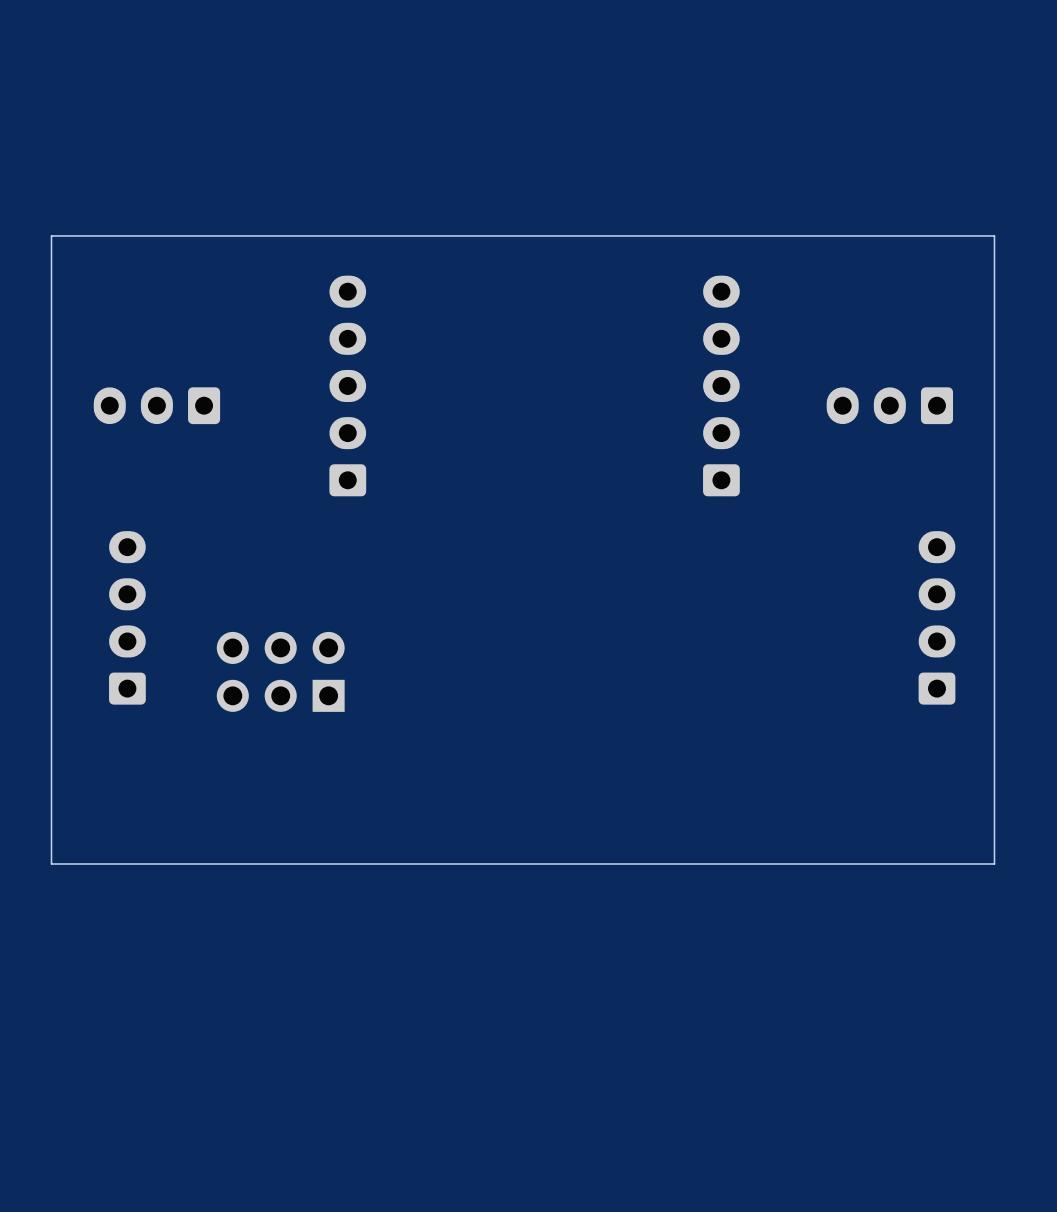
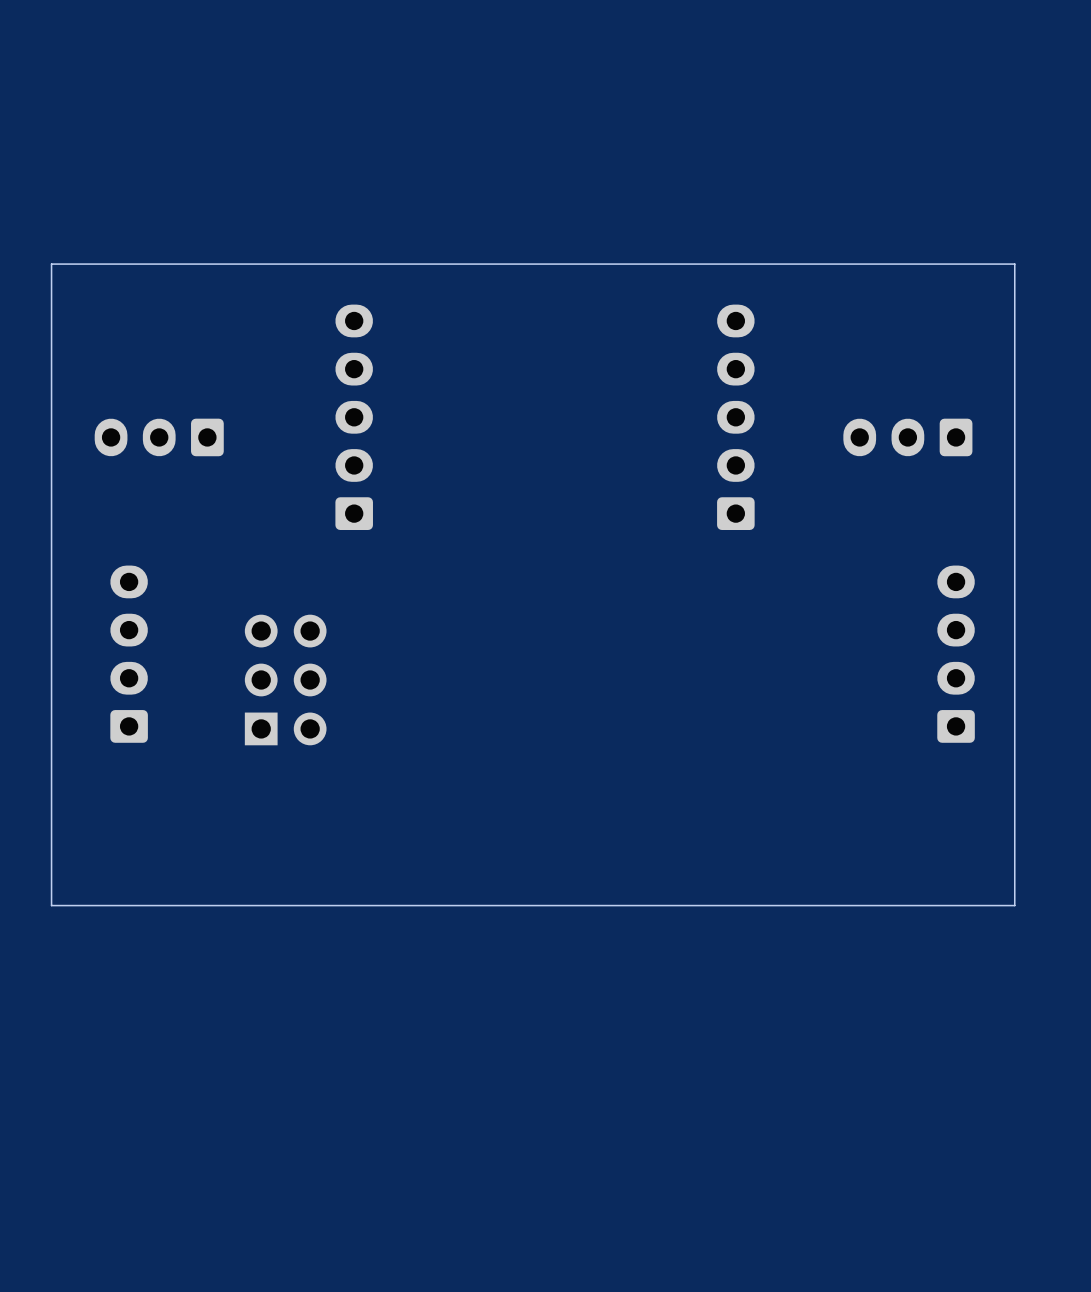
part rotation: 0° (280, 671) -> 90° clockwise (285, 679)

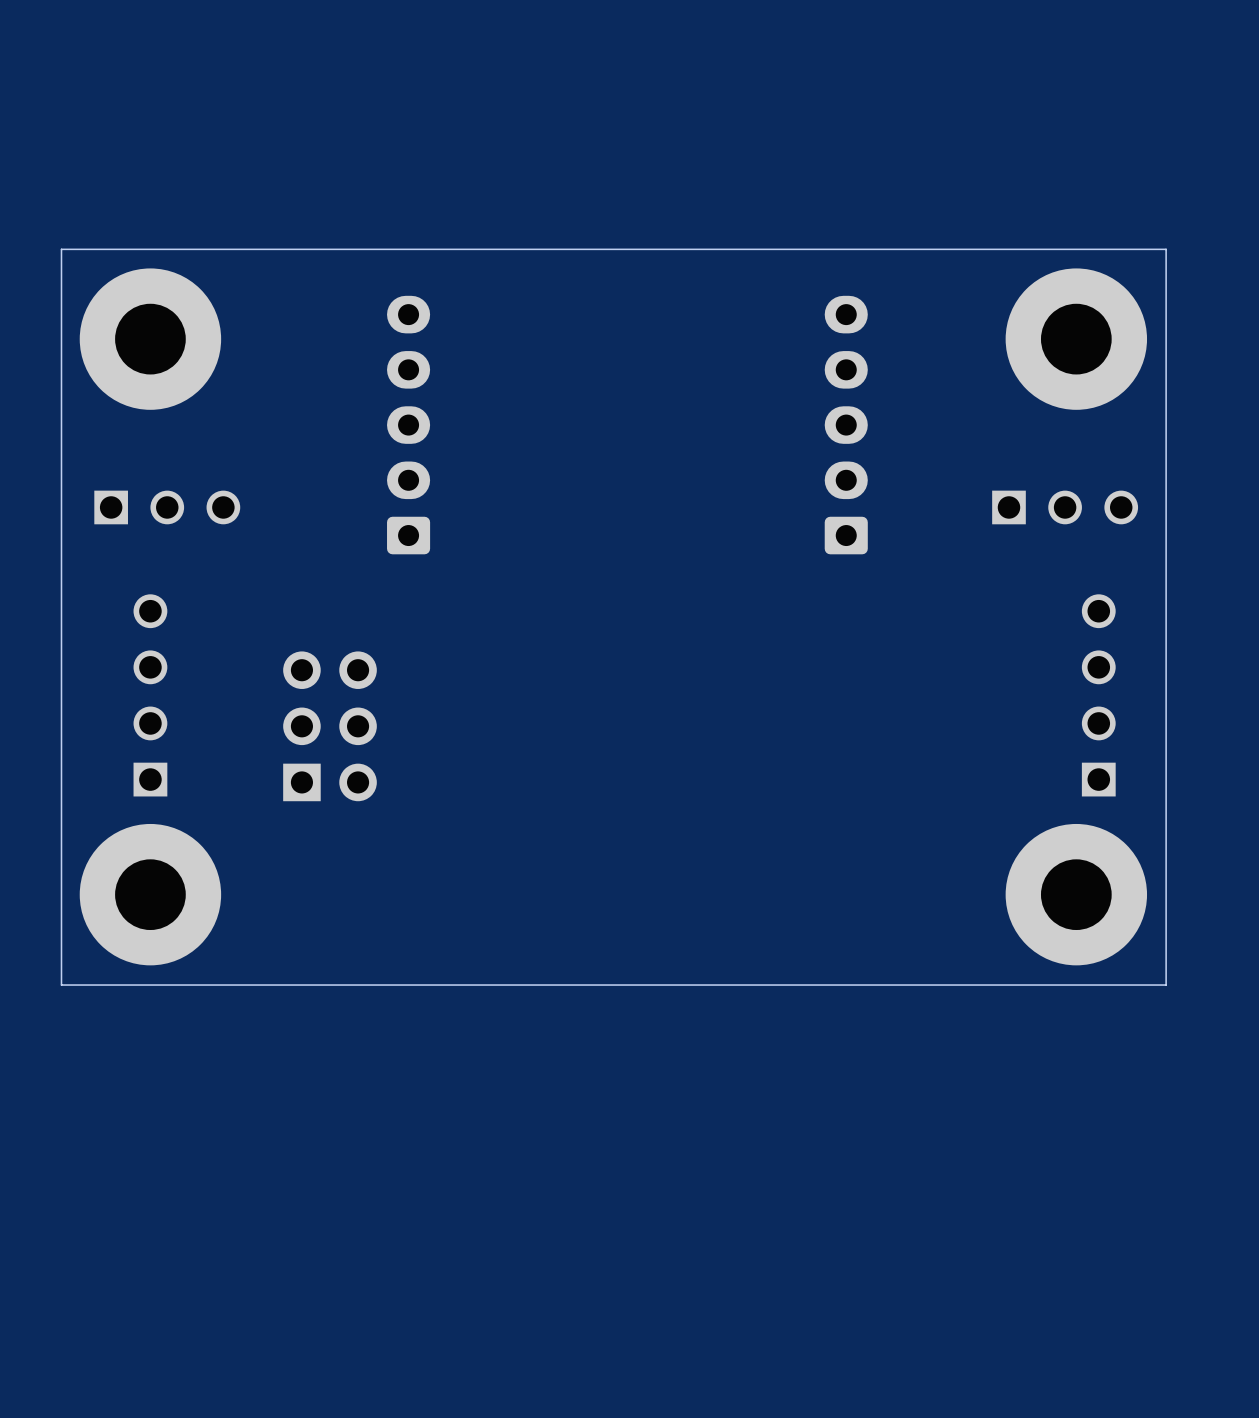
part: none -> (150, 339)
part: none -> (1076, 339)
part: (159, 437) -> none
part: (907, 437) -> none
part: none -> (167, 507)
part: none -> (1065, 507)
part footprint: [110, 565, 148, 743] -> [133, 594, 168, 797]
part footprint: [937, 565, 975, 743] -> [1081, 594, 1116, 797]
part: none -> (150, 894)
part: none -> (1076, 894)

